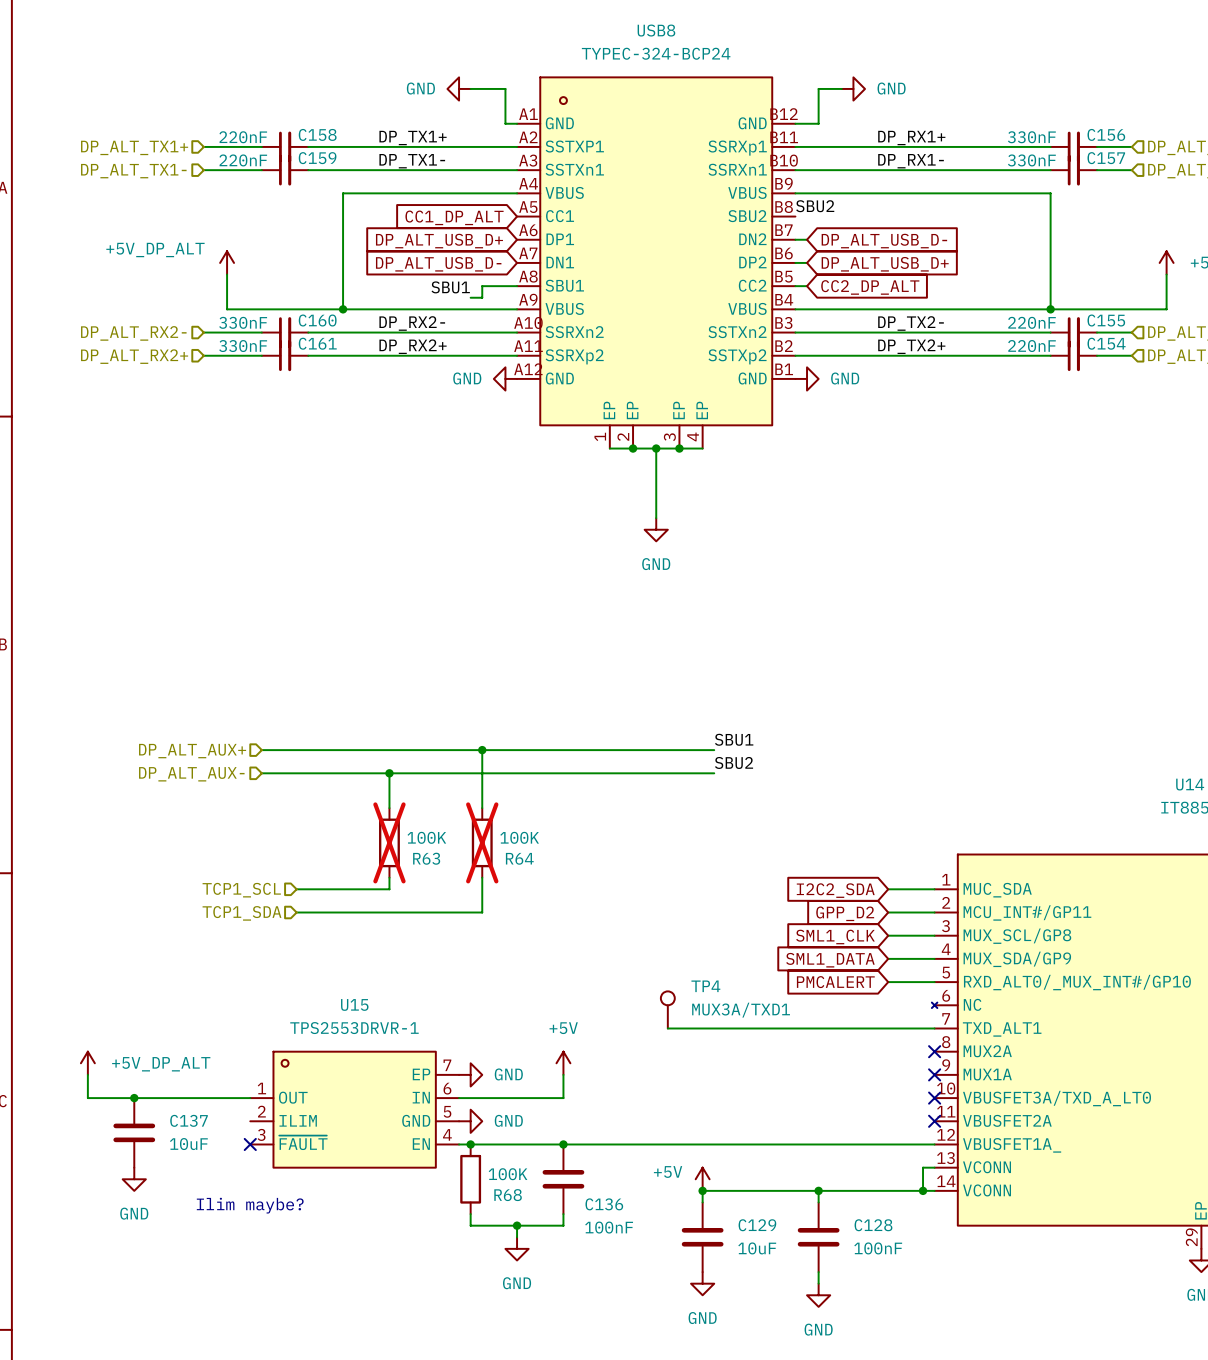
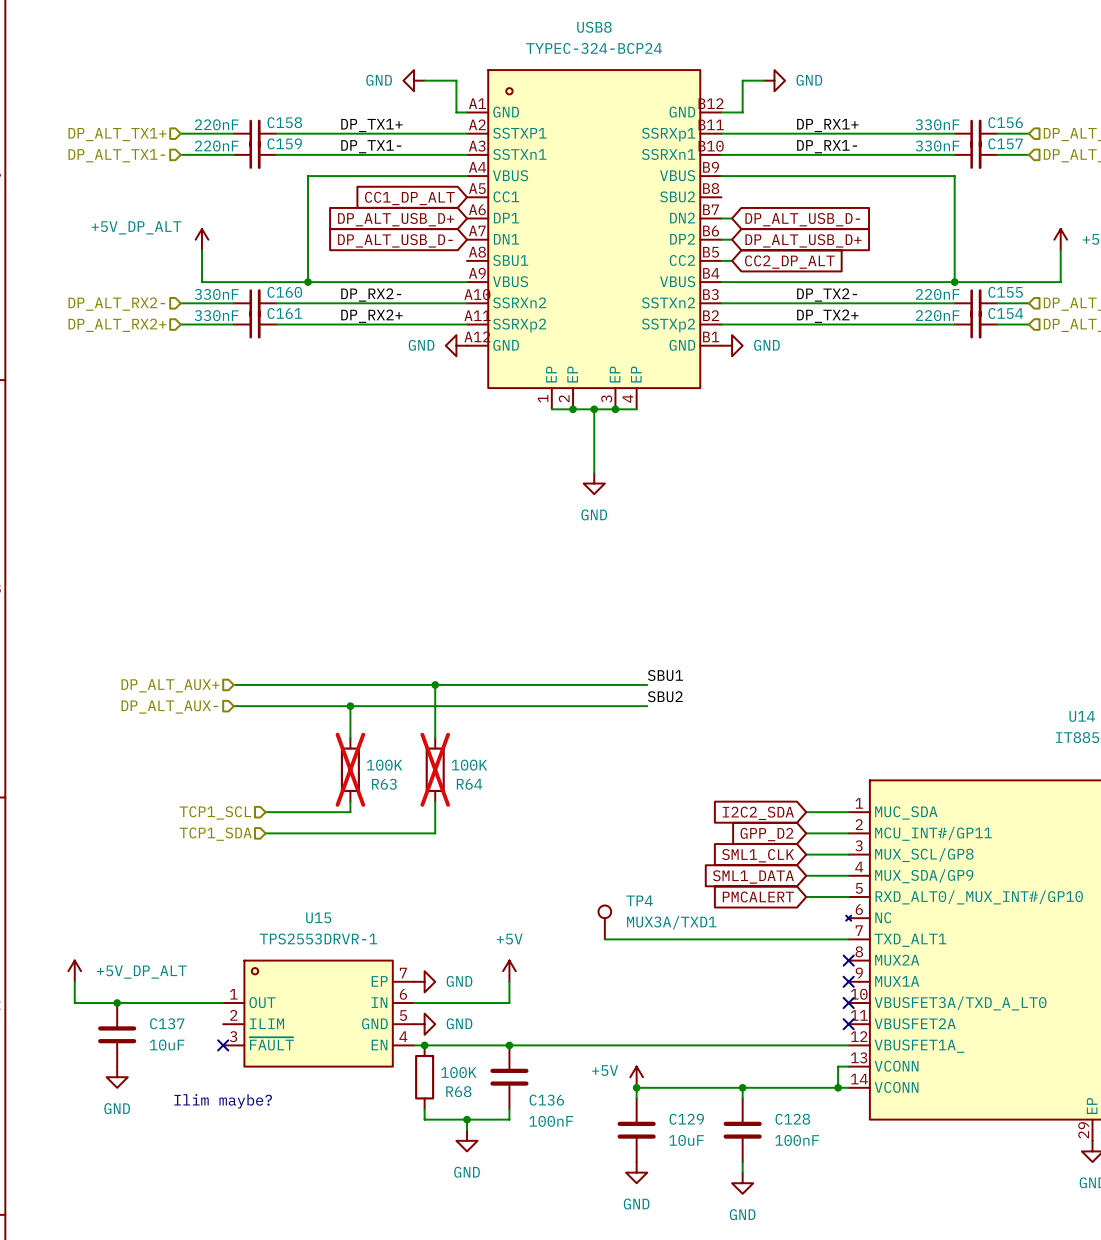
label: SBU2 (815, 206) -> none
wire: (517, 286) (482, 286) (482, 297) (470, 297) -> none
label: SBU1 (450, 287) -> none

